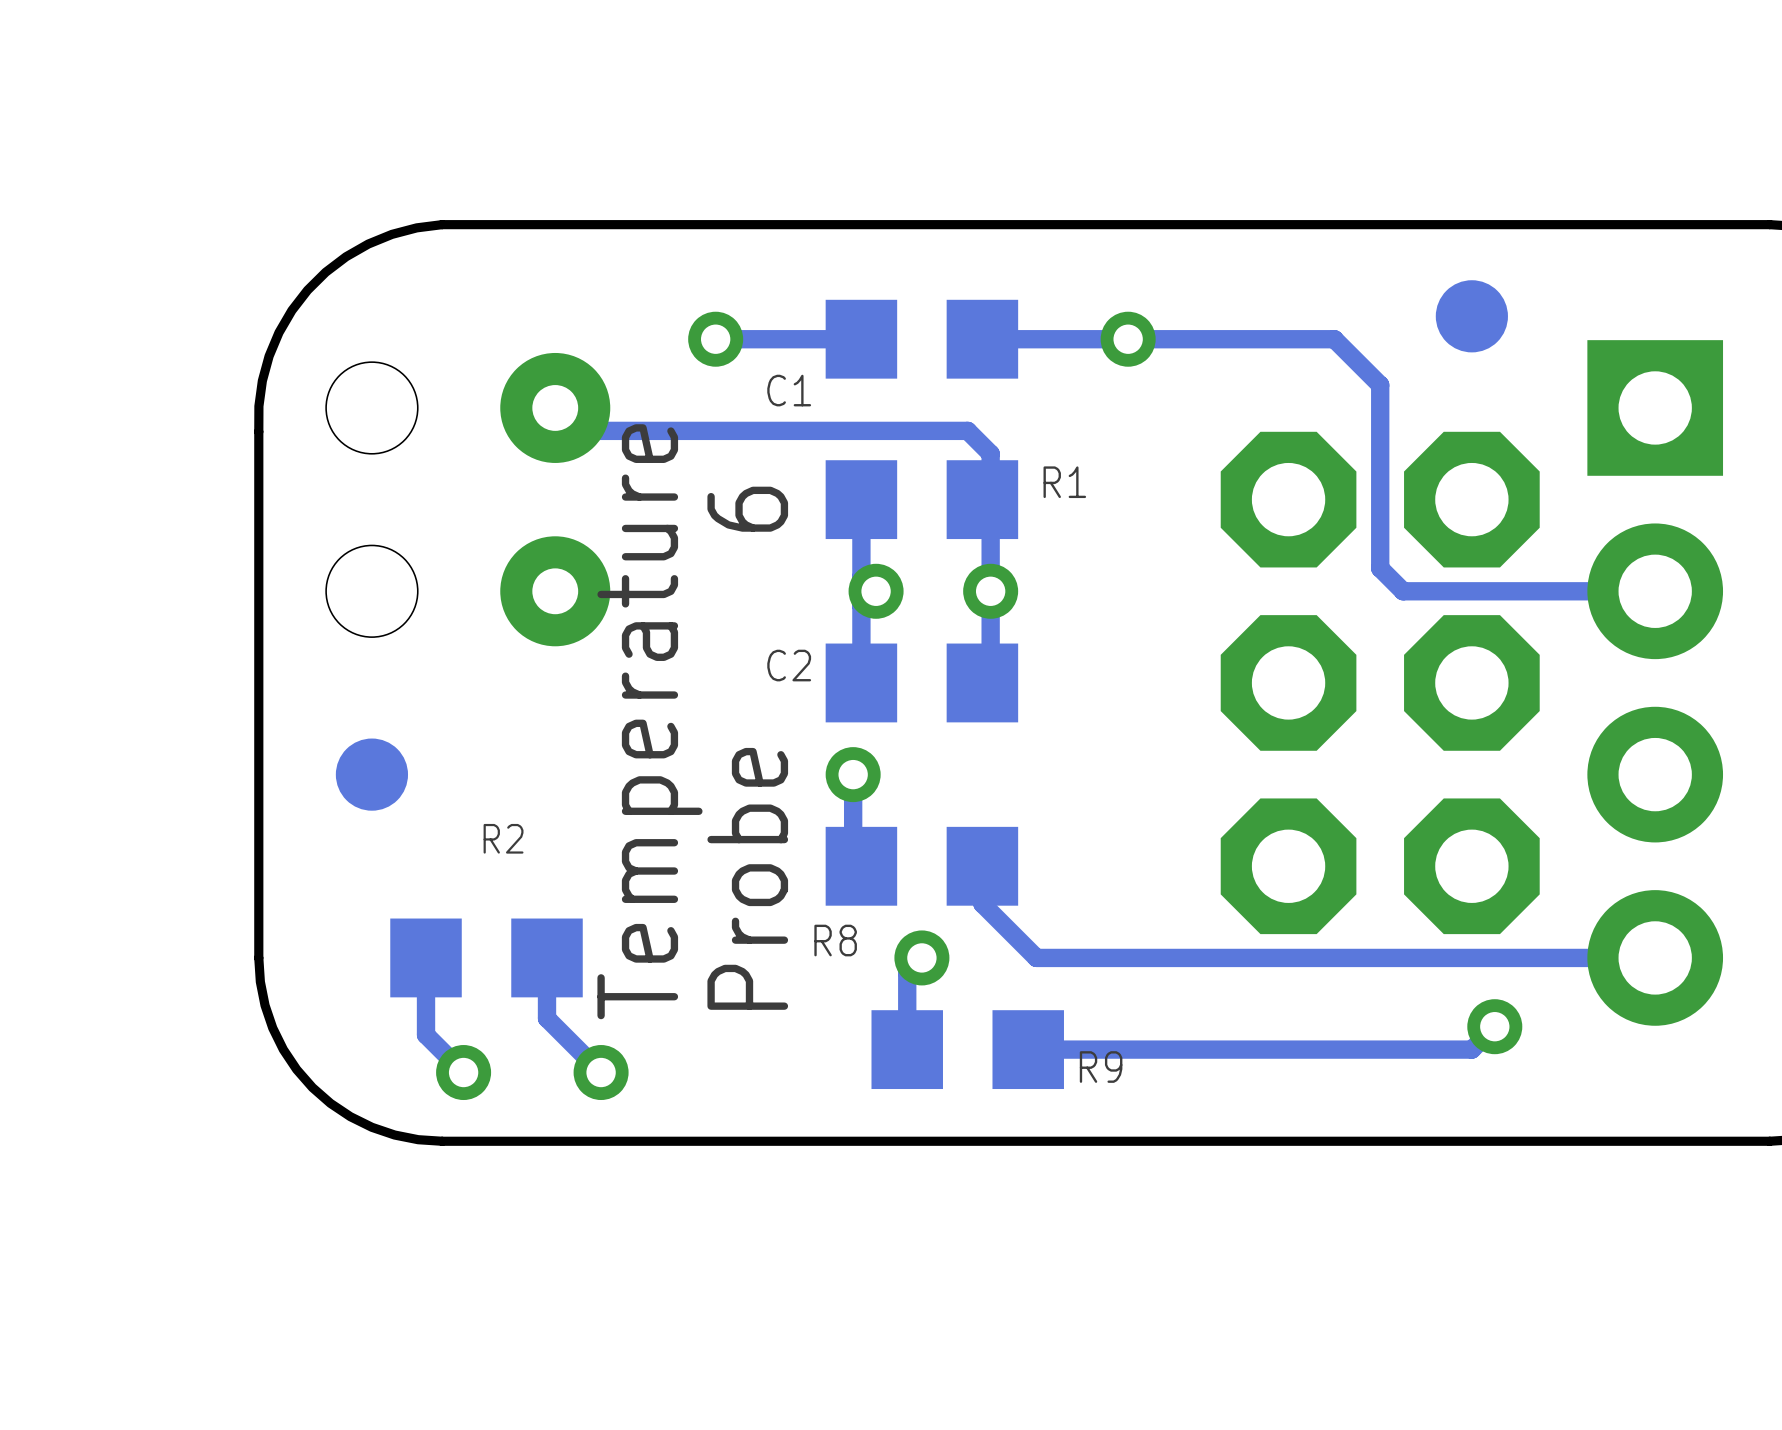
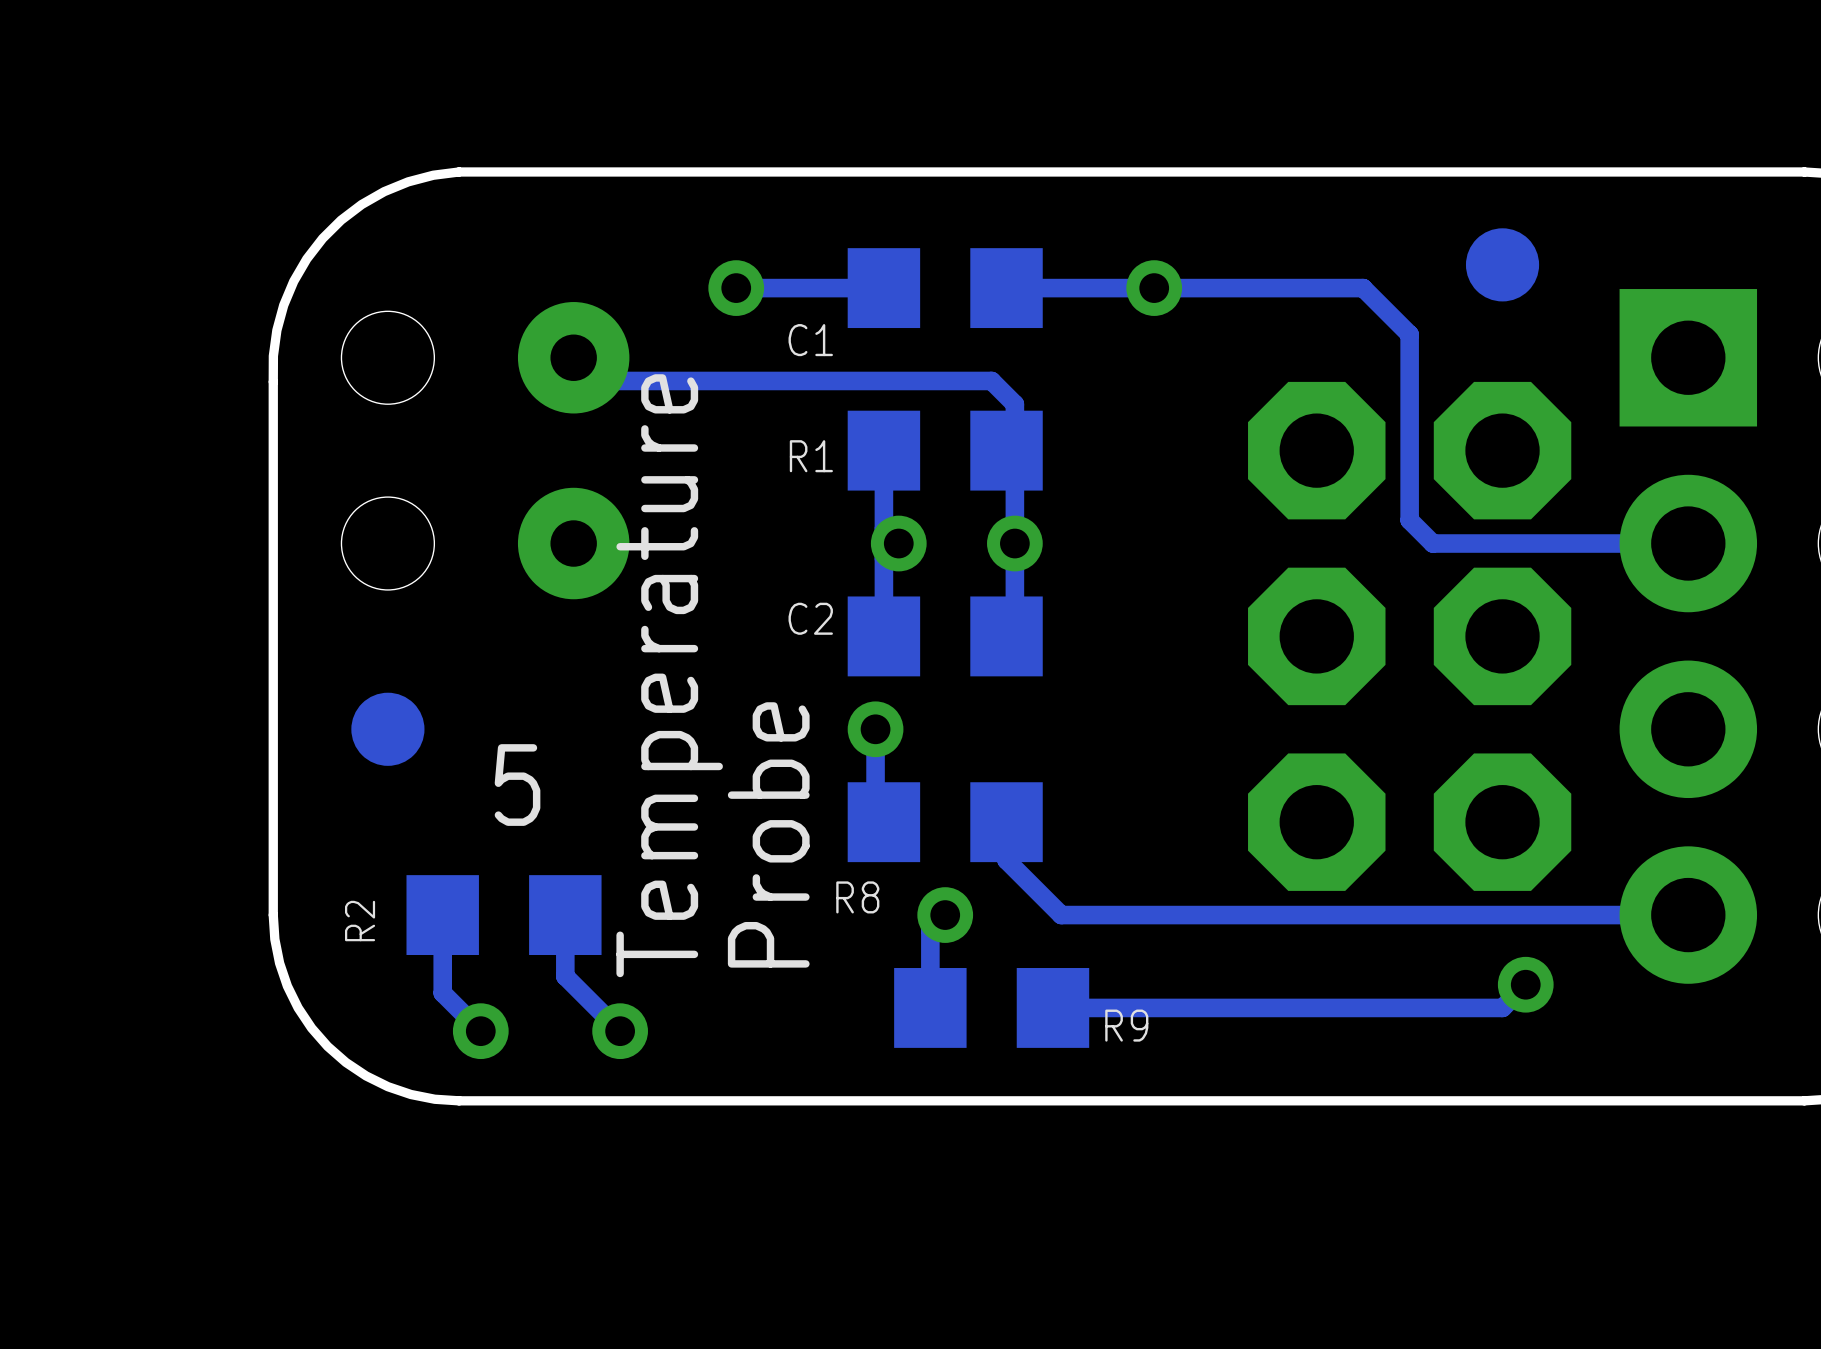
R1 name position: R1 (1064, 482) -> R1 (811, 456)
text: 6 (747, 509) -> none
text: none -> 5 (517, 785)
R2 name rotation: 0° (503, 838) -> 90° counterclockwise (360, 921)
R2 name position: R2 (503, 838) -> R2 (360, 921)

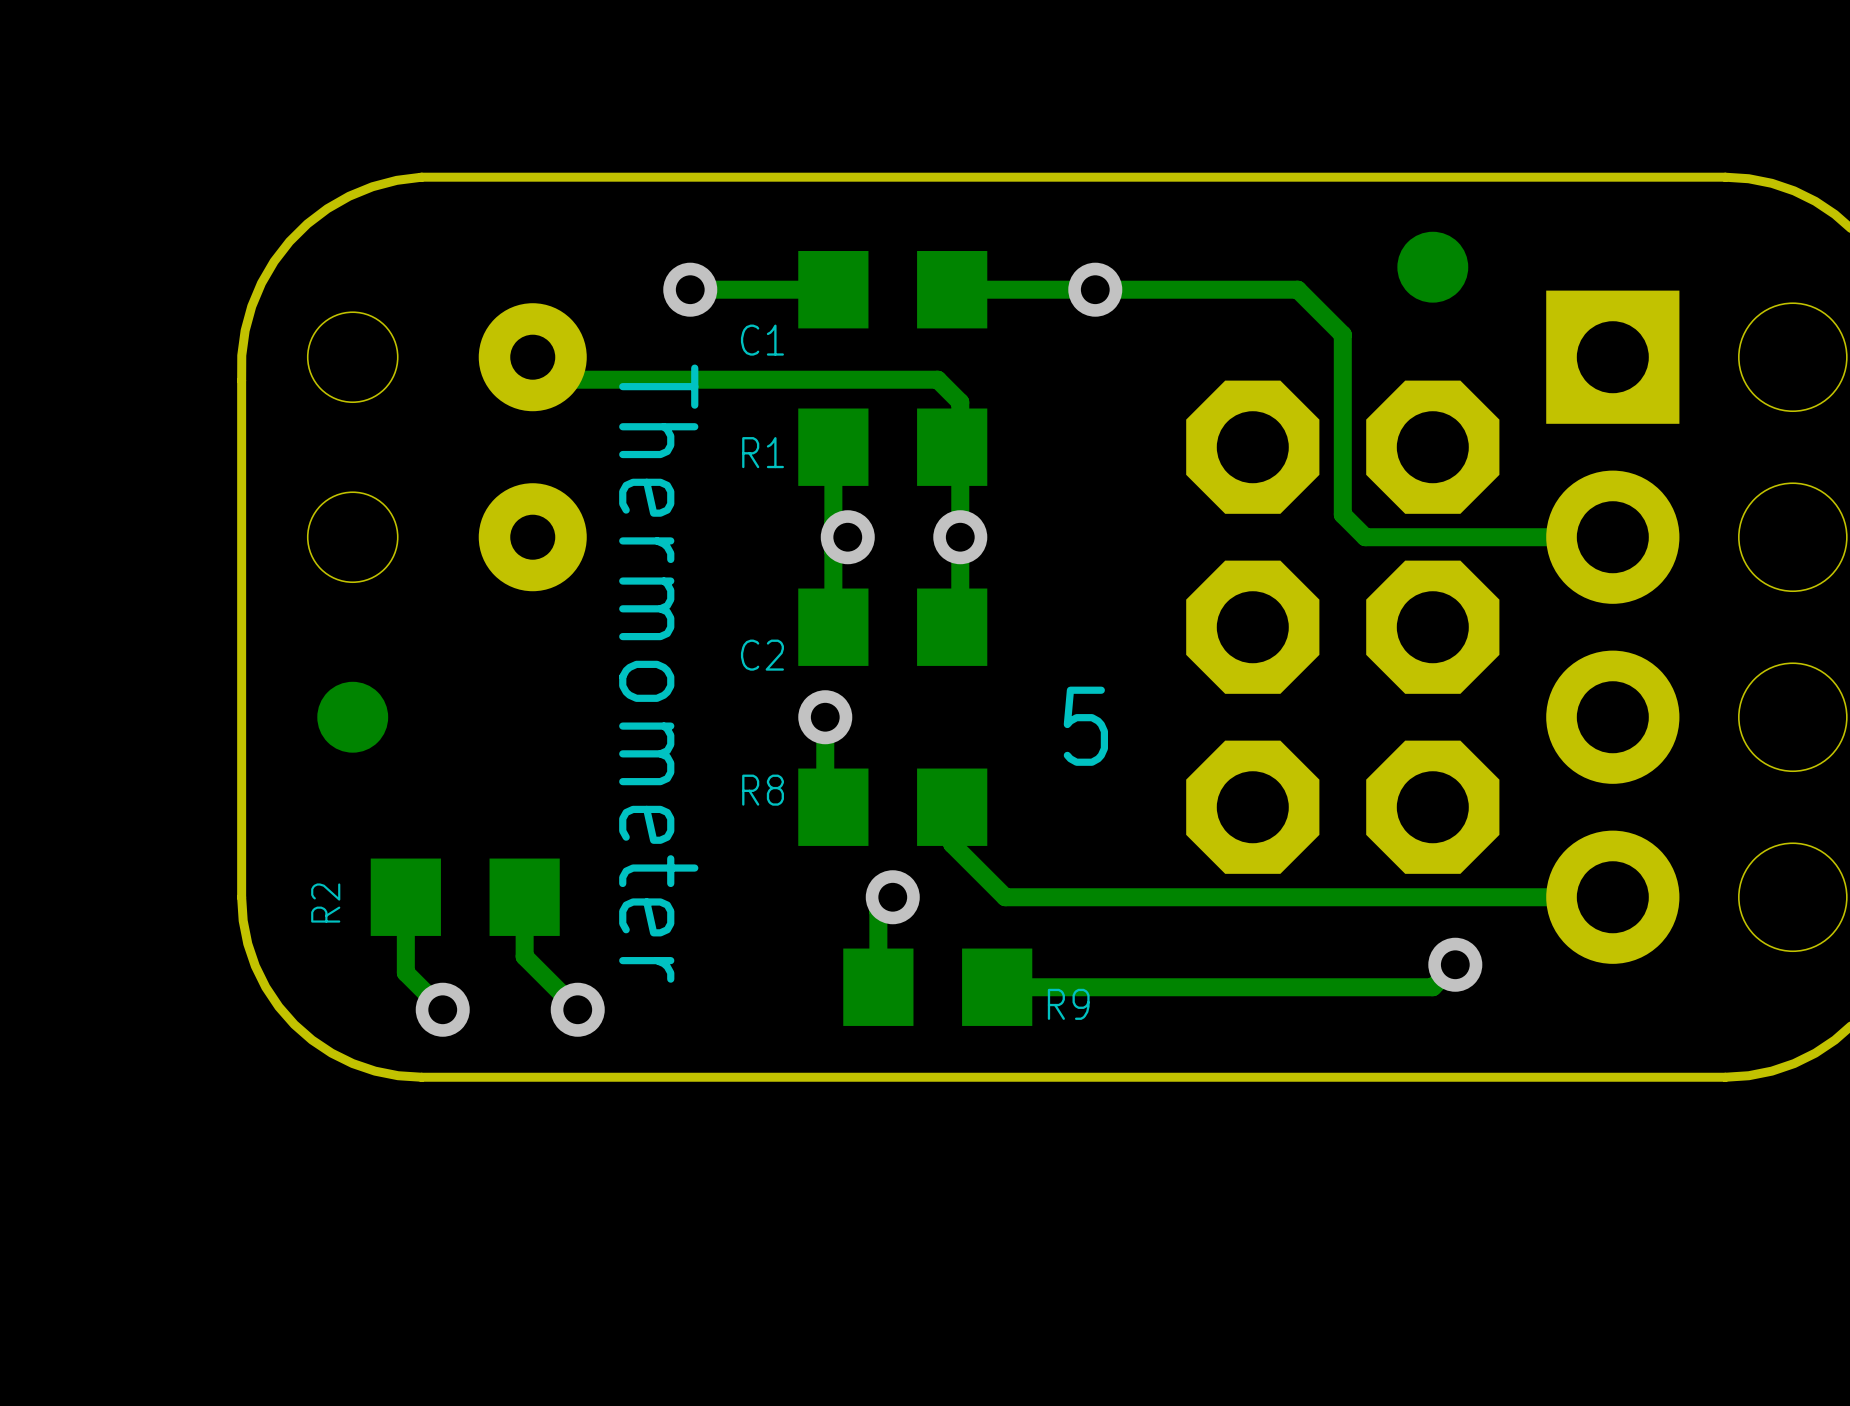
C2 name position: C2 (810, 618) -> C2 (762, 655)
text: Temperature (669, 675) -> none
text: none -> Thermometer (658, 673)
text position: 5 (517, 785) -> 5 (1085, 726)
text: Probe (768, 834) -> none
R8 name position: R8 (857, 897) -> R8 (763, 790)

